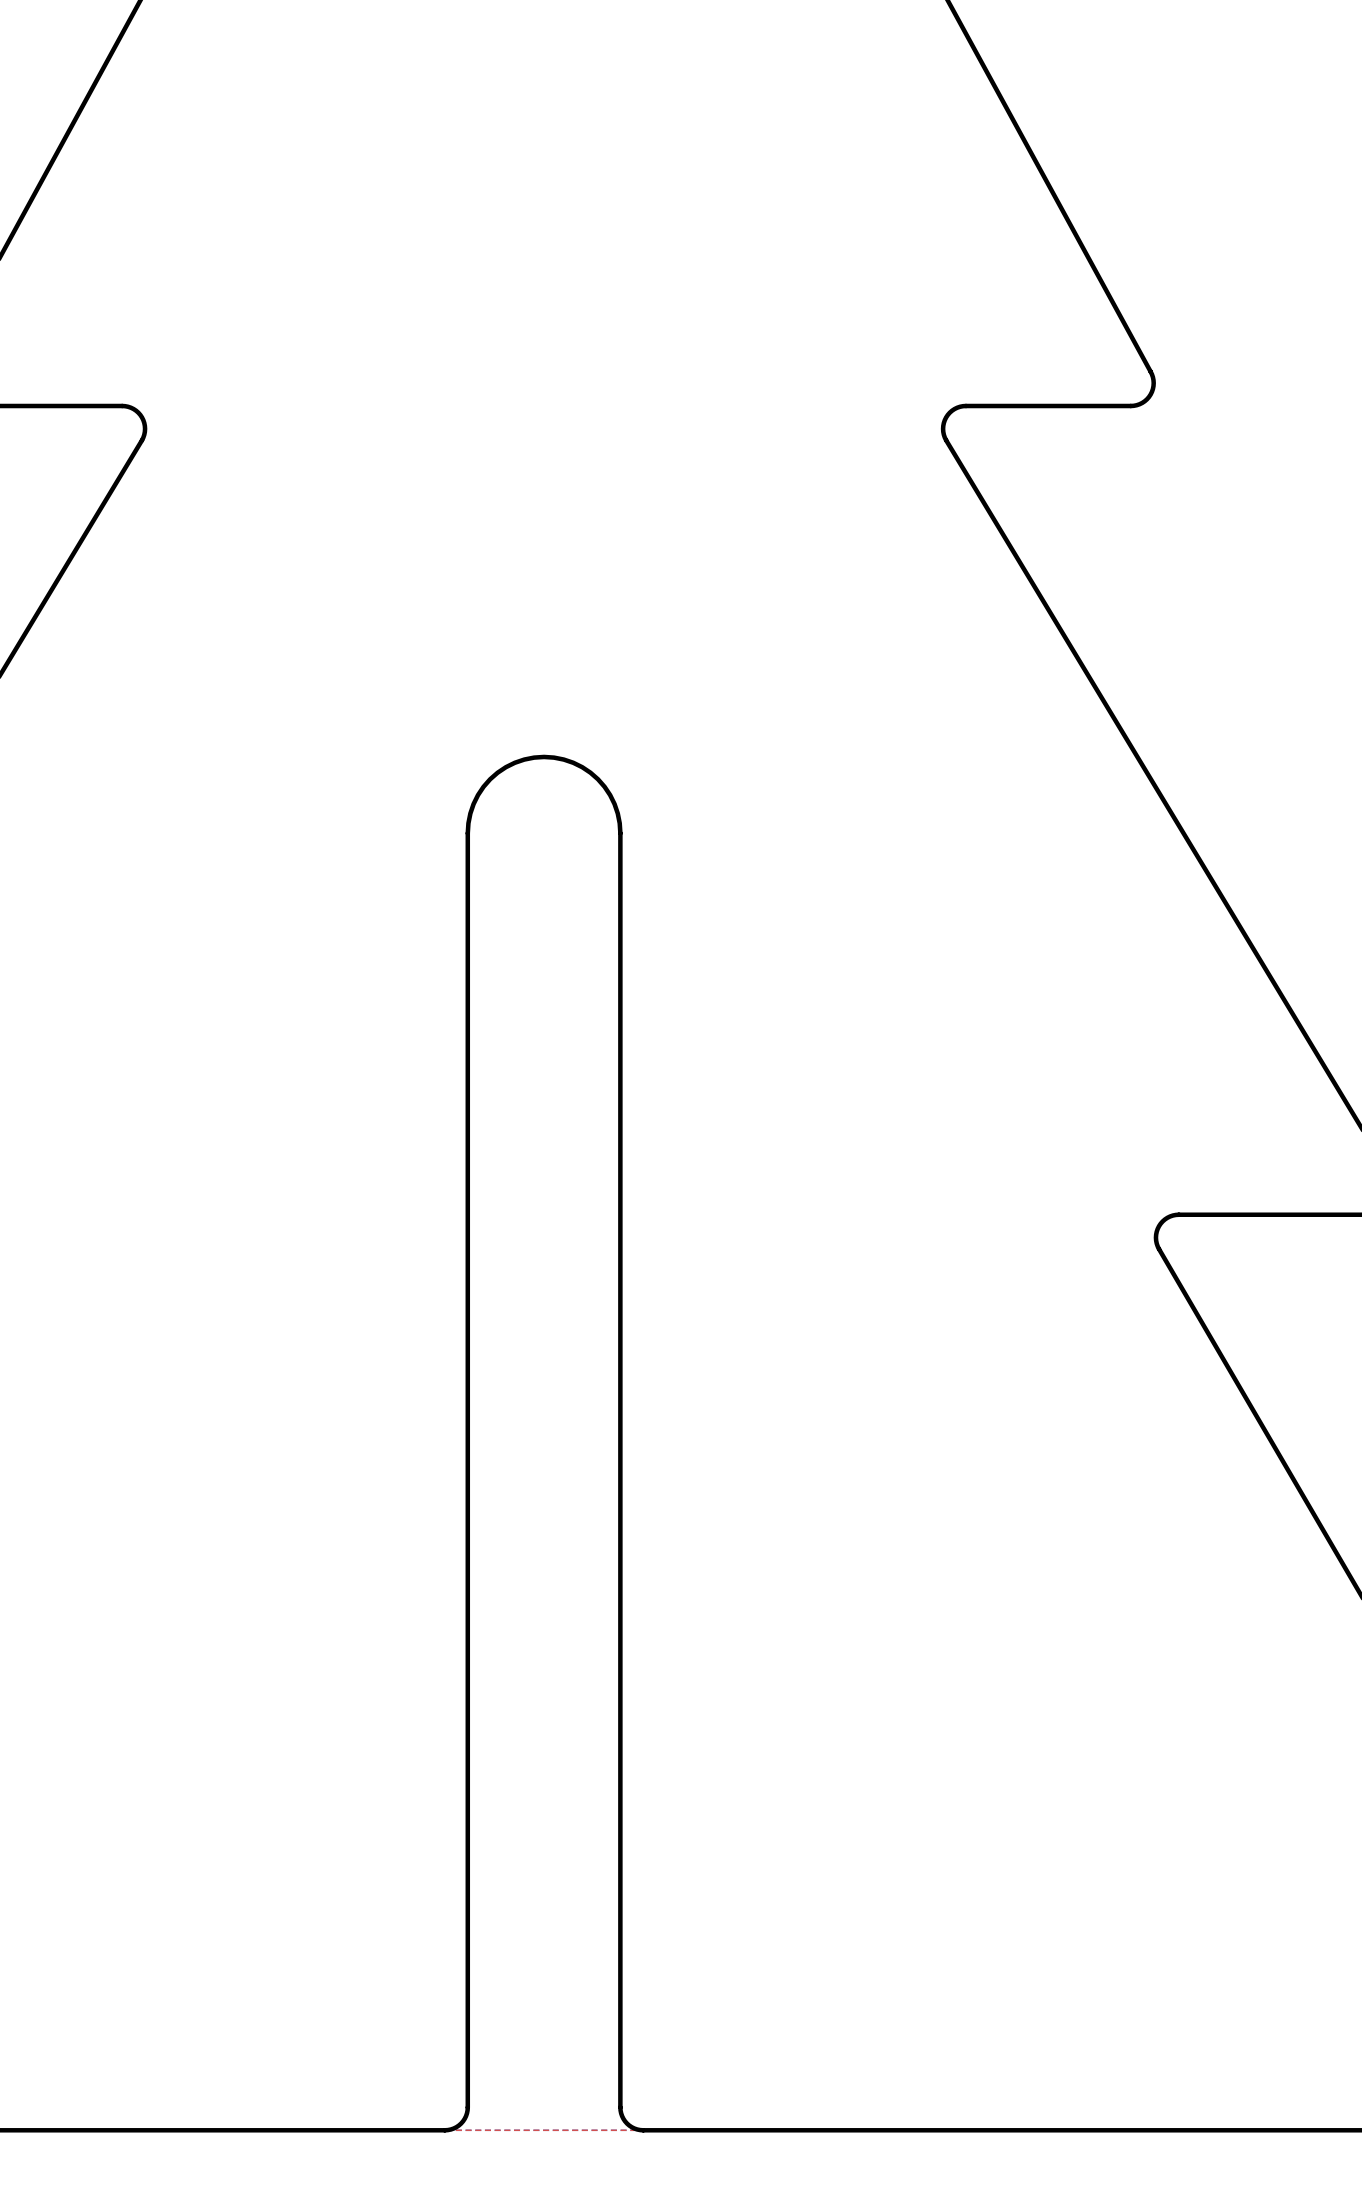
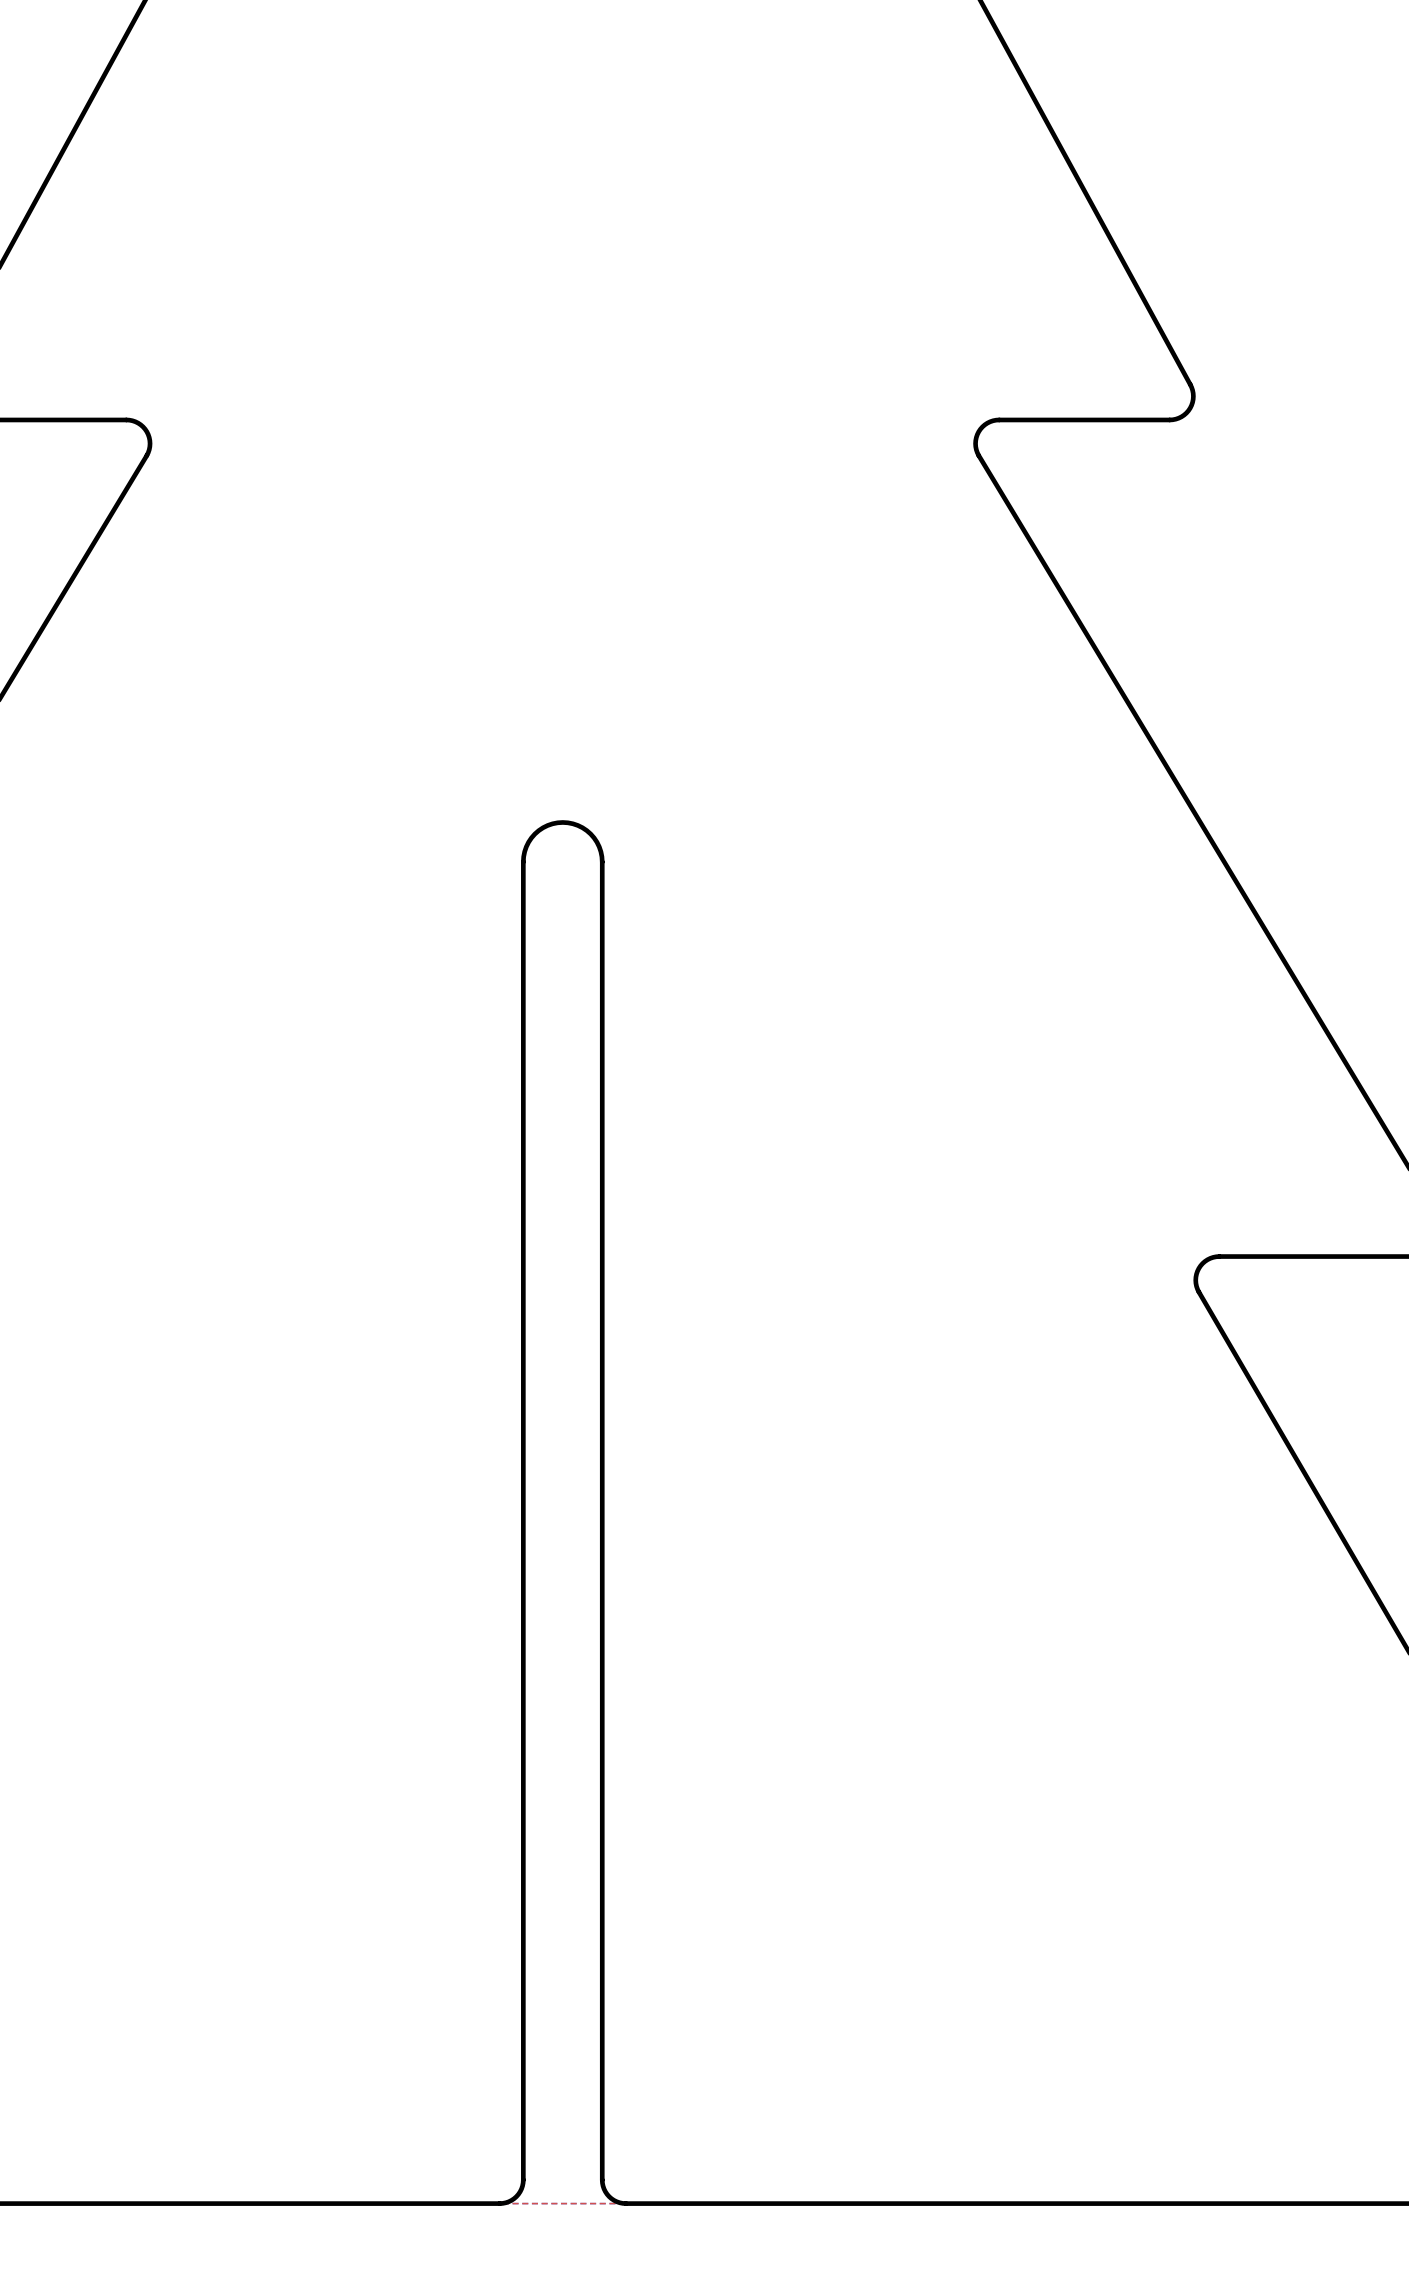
board edge: (444, 2130) (453, 2128) (461, 2123) (466, 2116) (467, 2107) (468, 823) (478, 795) (490, 779) (514, 762) (544, 756) (573, 762) (598, 779) (610, 795) (619, 823) (620, 2107) (622, 2116) (627, 2123) (634, 2128) (643, 2130) -> (460, 2203) (505, 2202) (516, 2196) (523, 2183) (523, 861) (526, 846) (534, 834) (547, 825) (562, 822) (577, 825) (590, 834) (599, 846) (602, 861) (602, 2183) (609, 2196) (619, 2202) (665, 2203)

